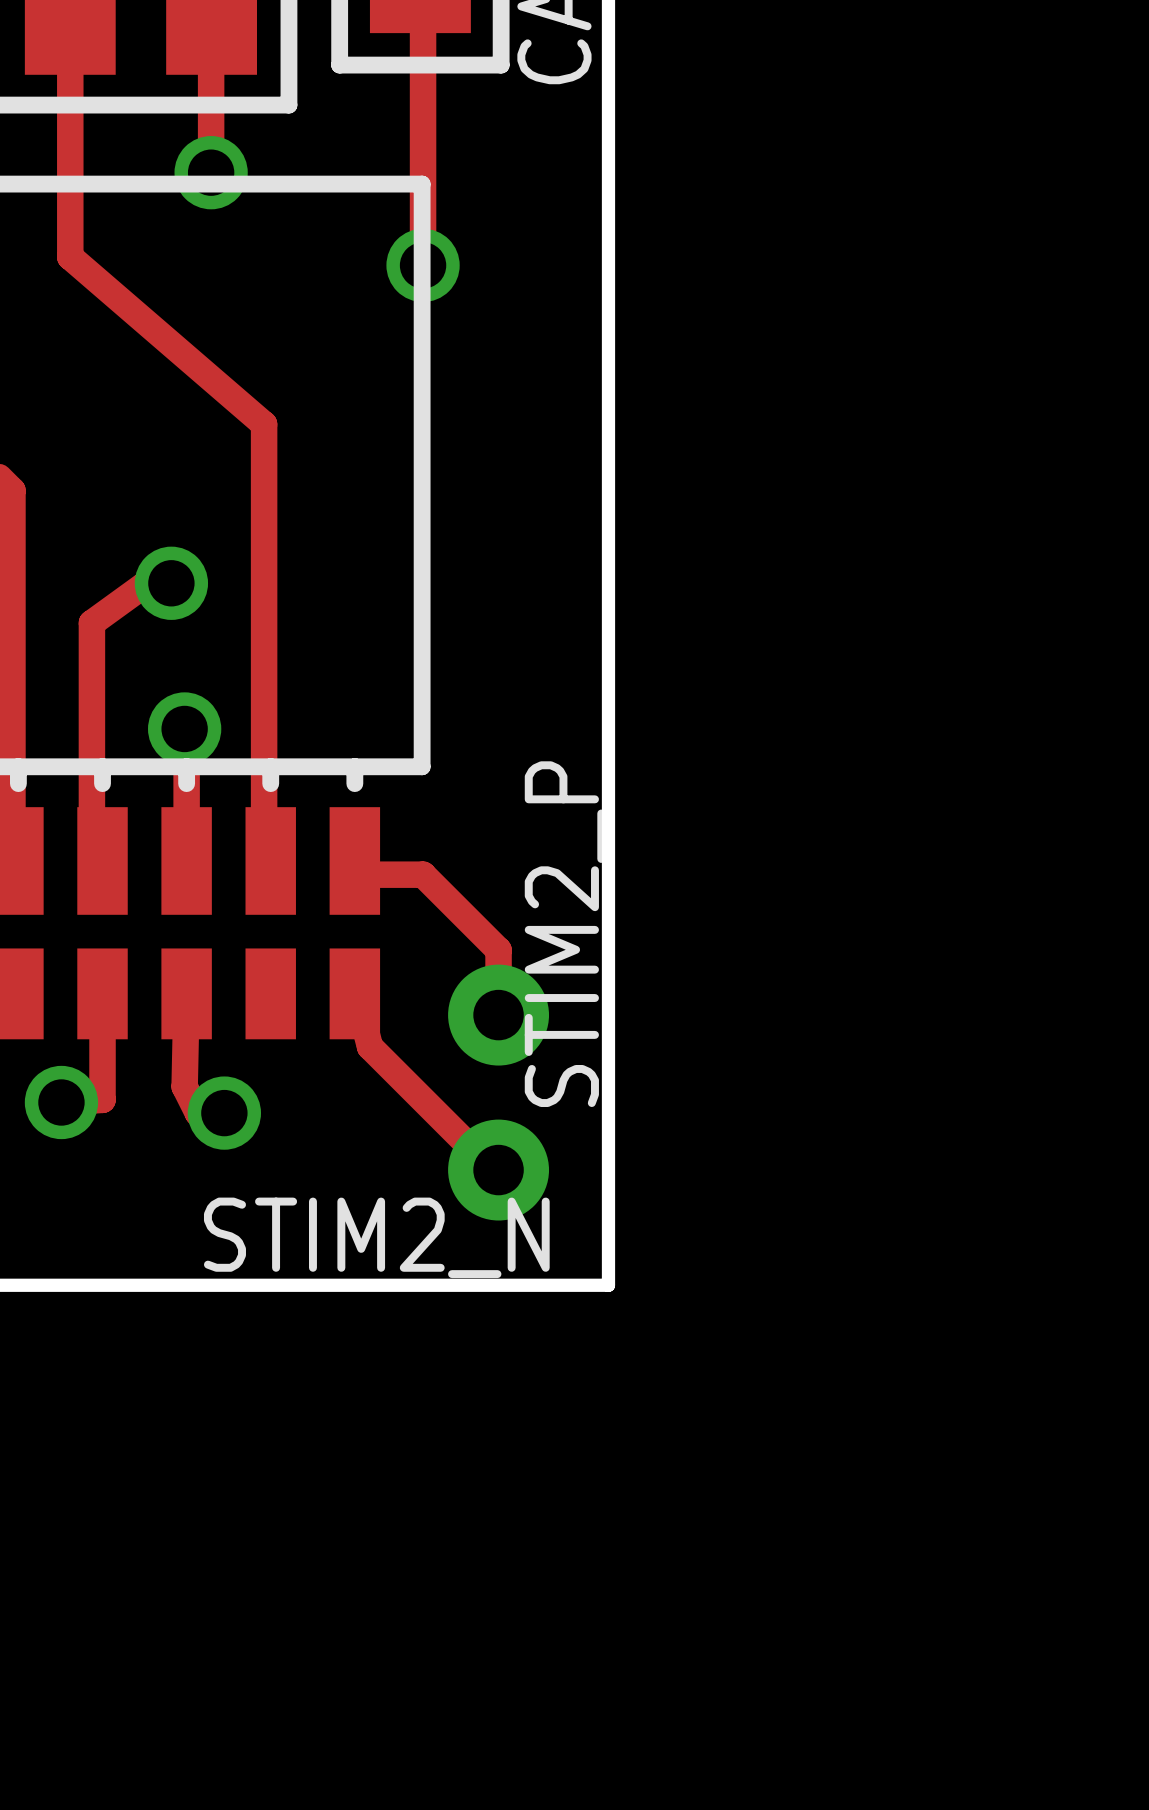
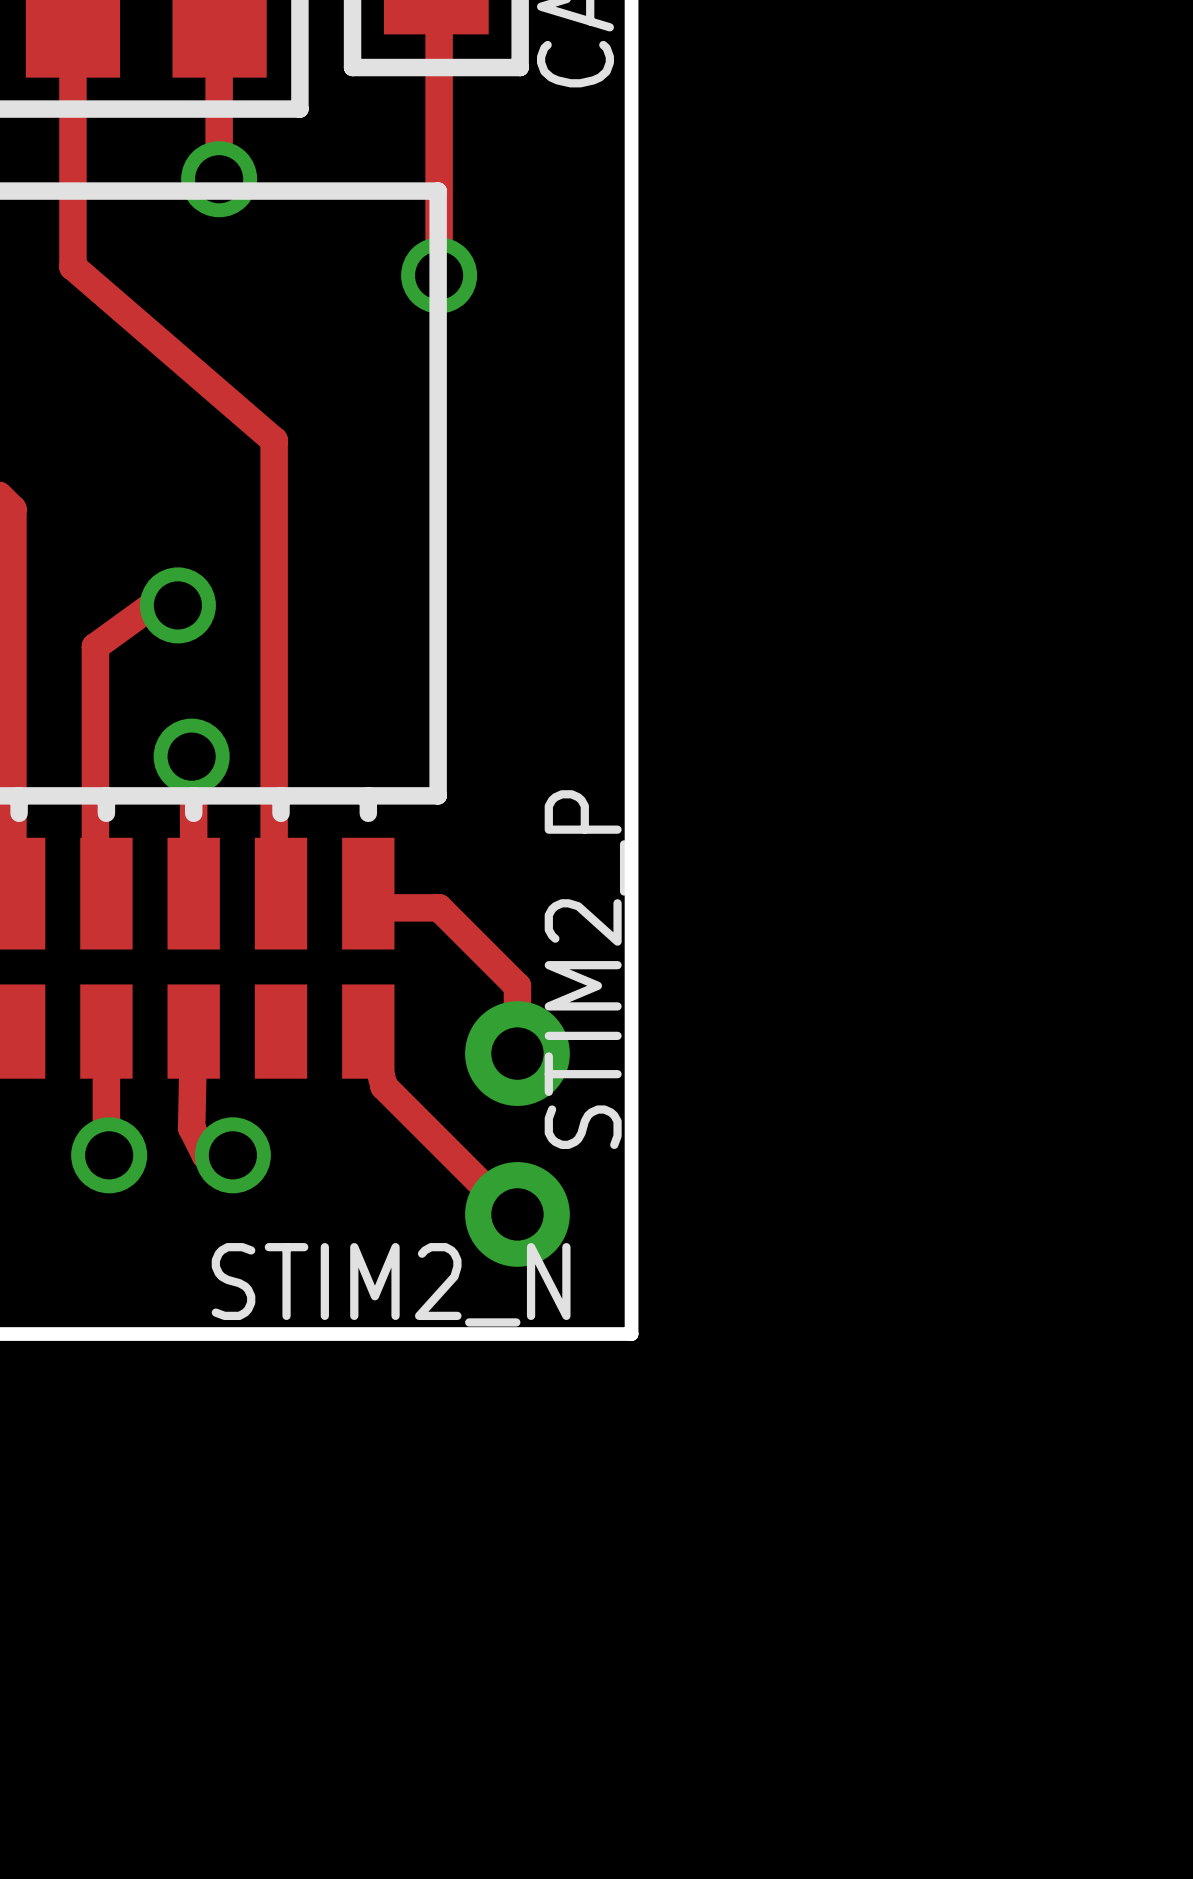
via position: (61, 1102) -> (109, 1155)

